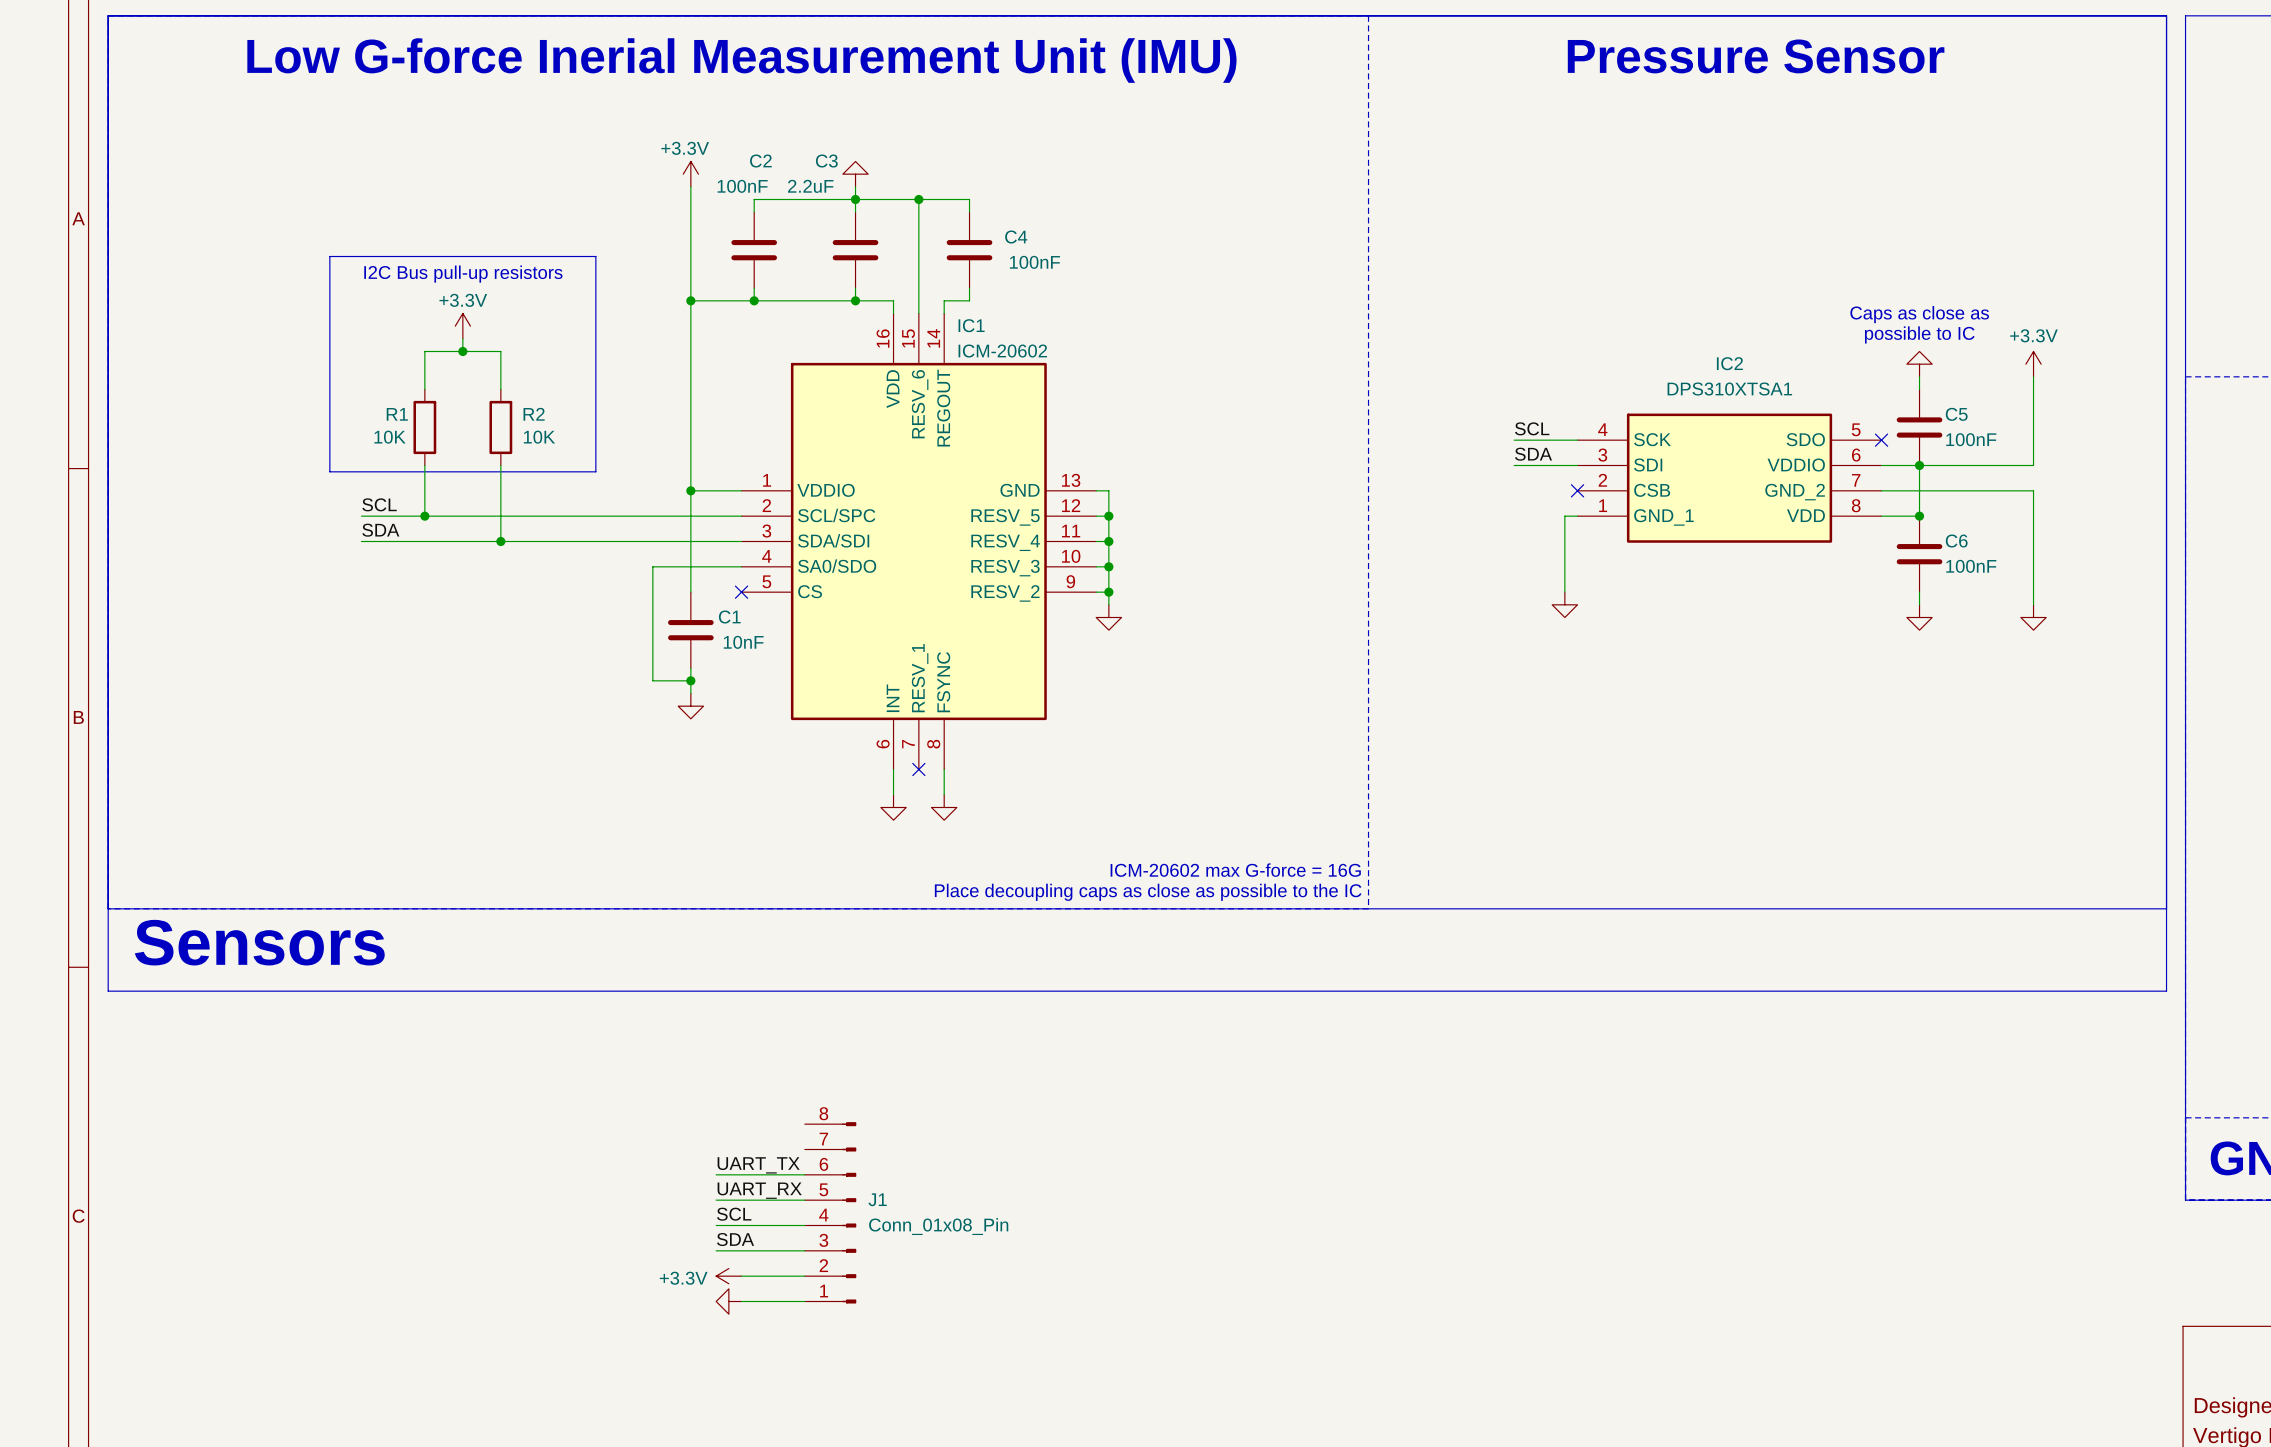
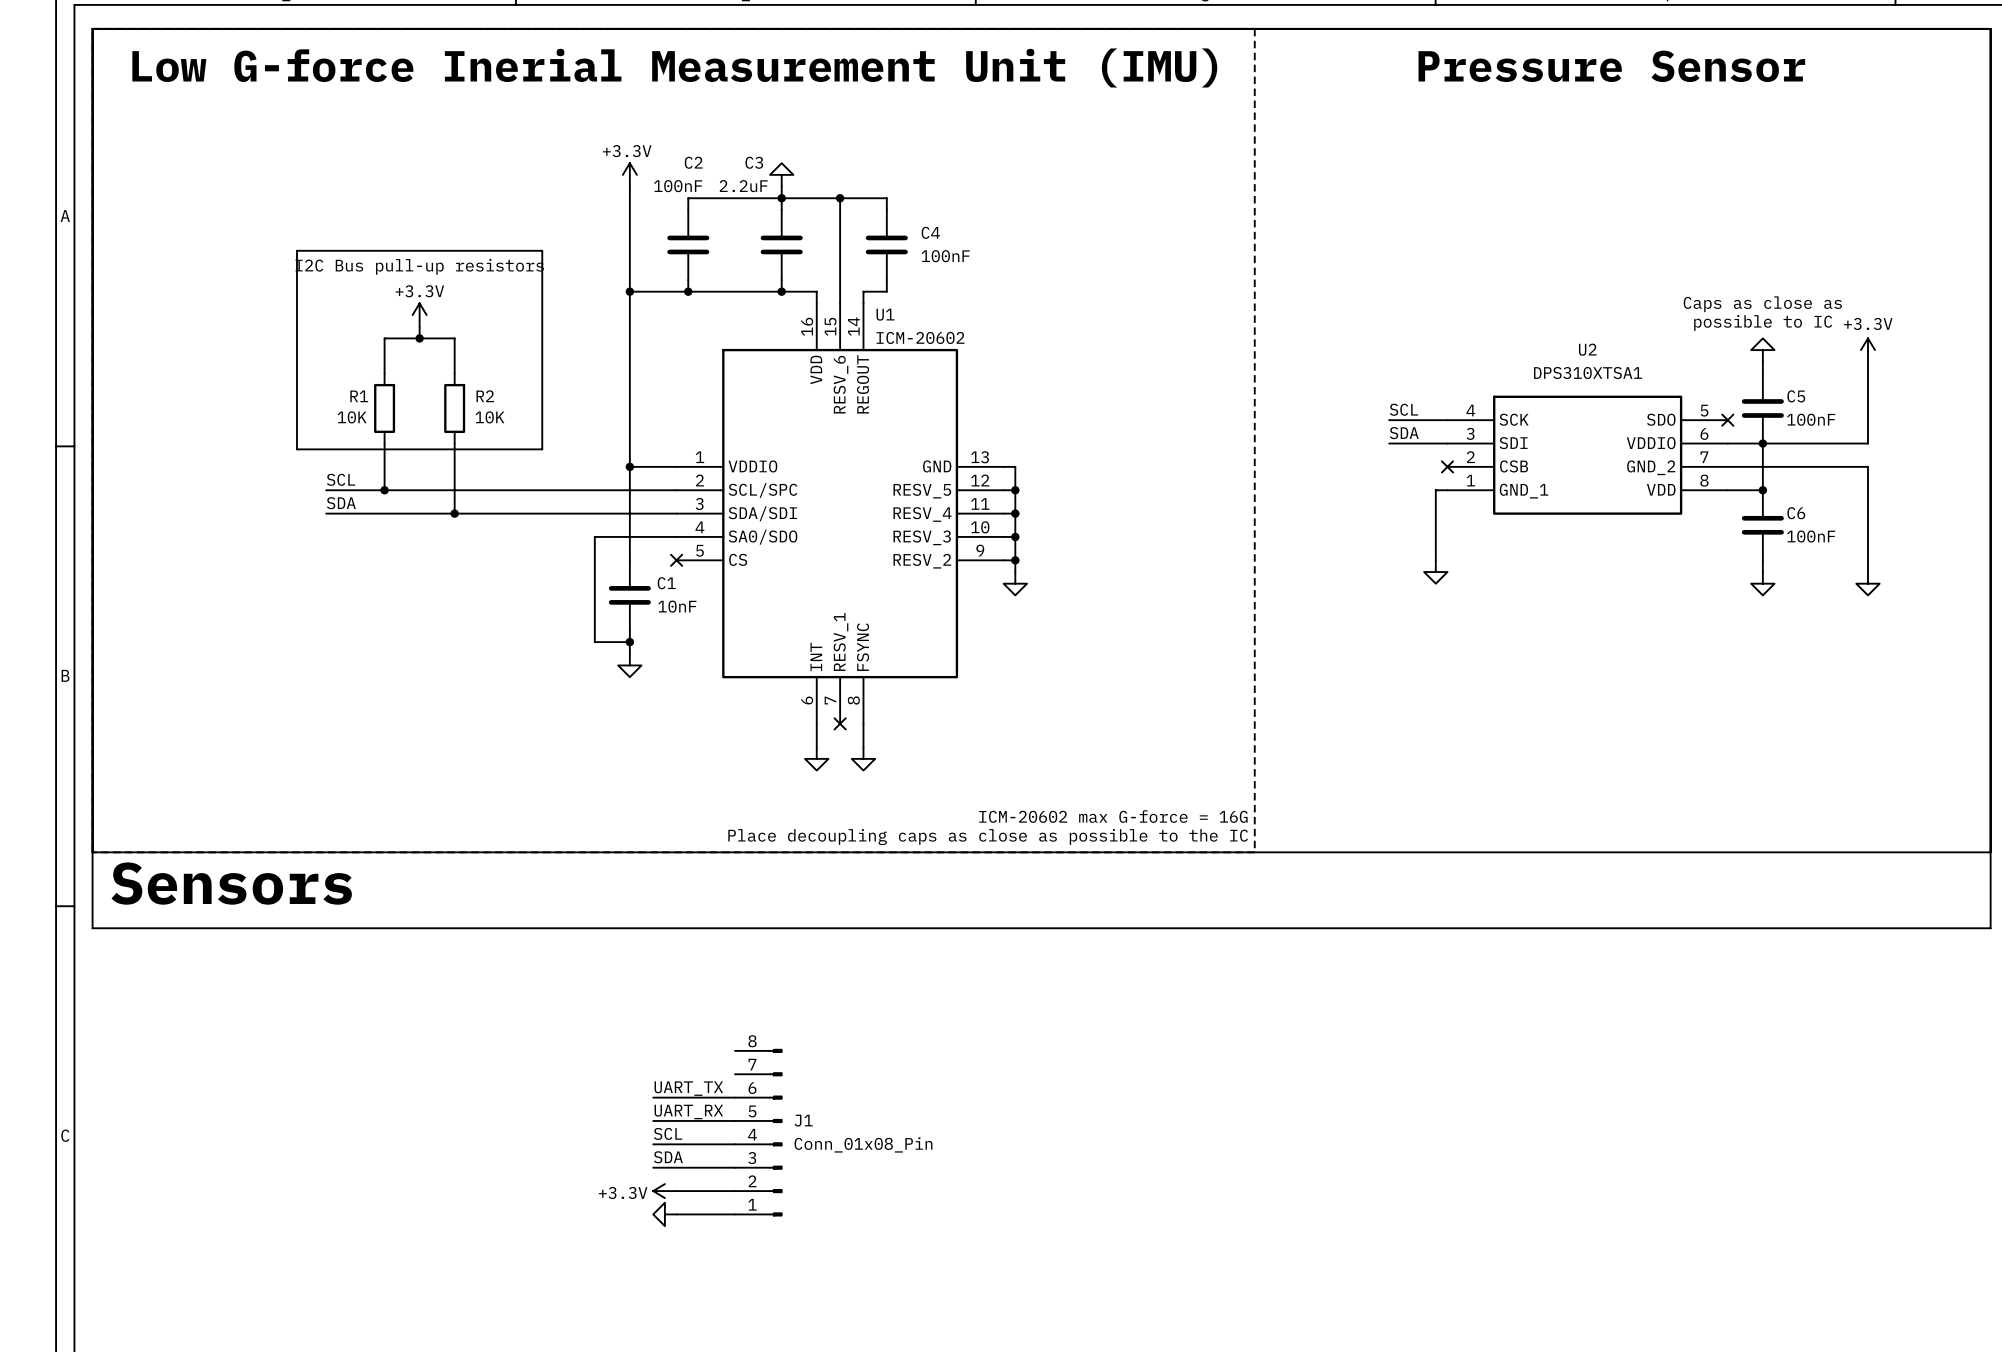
IC1 name: IC1 (971, 325) -> U1 (885, 314)
IC2 name: IC2 (1729, 363) -> U2 (1587, 349)

